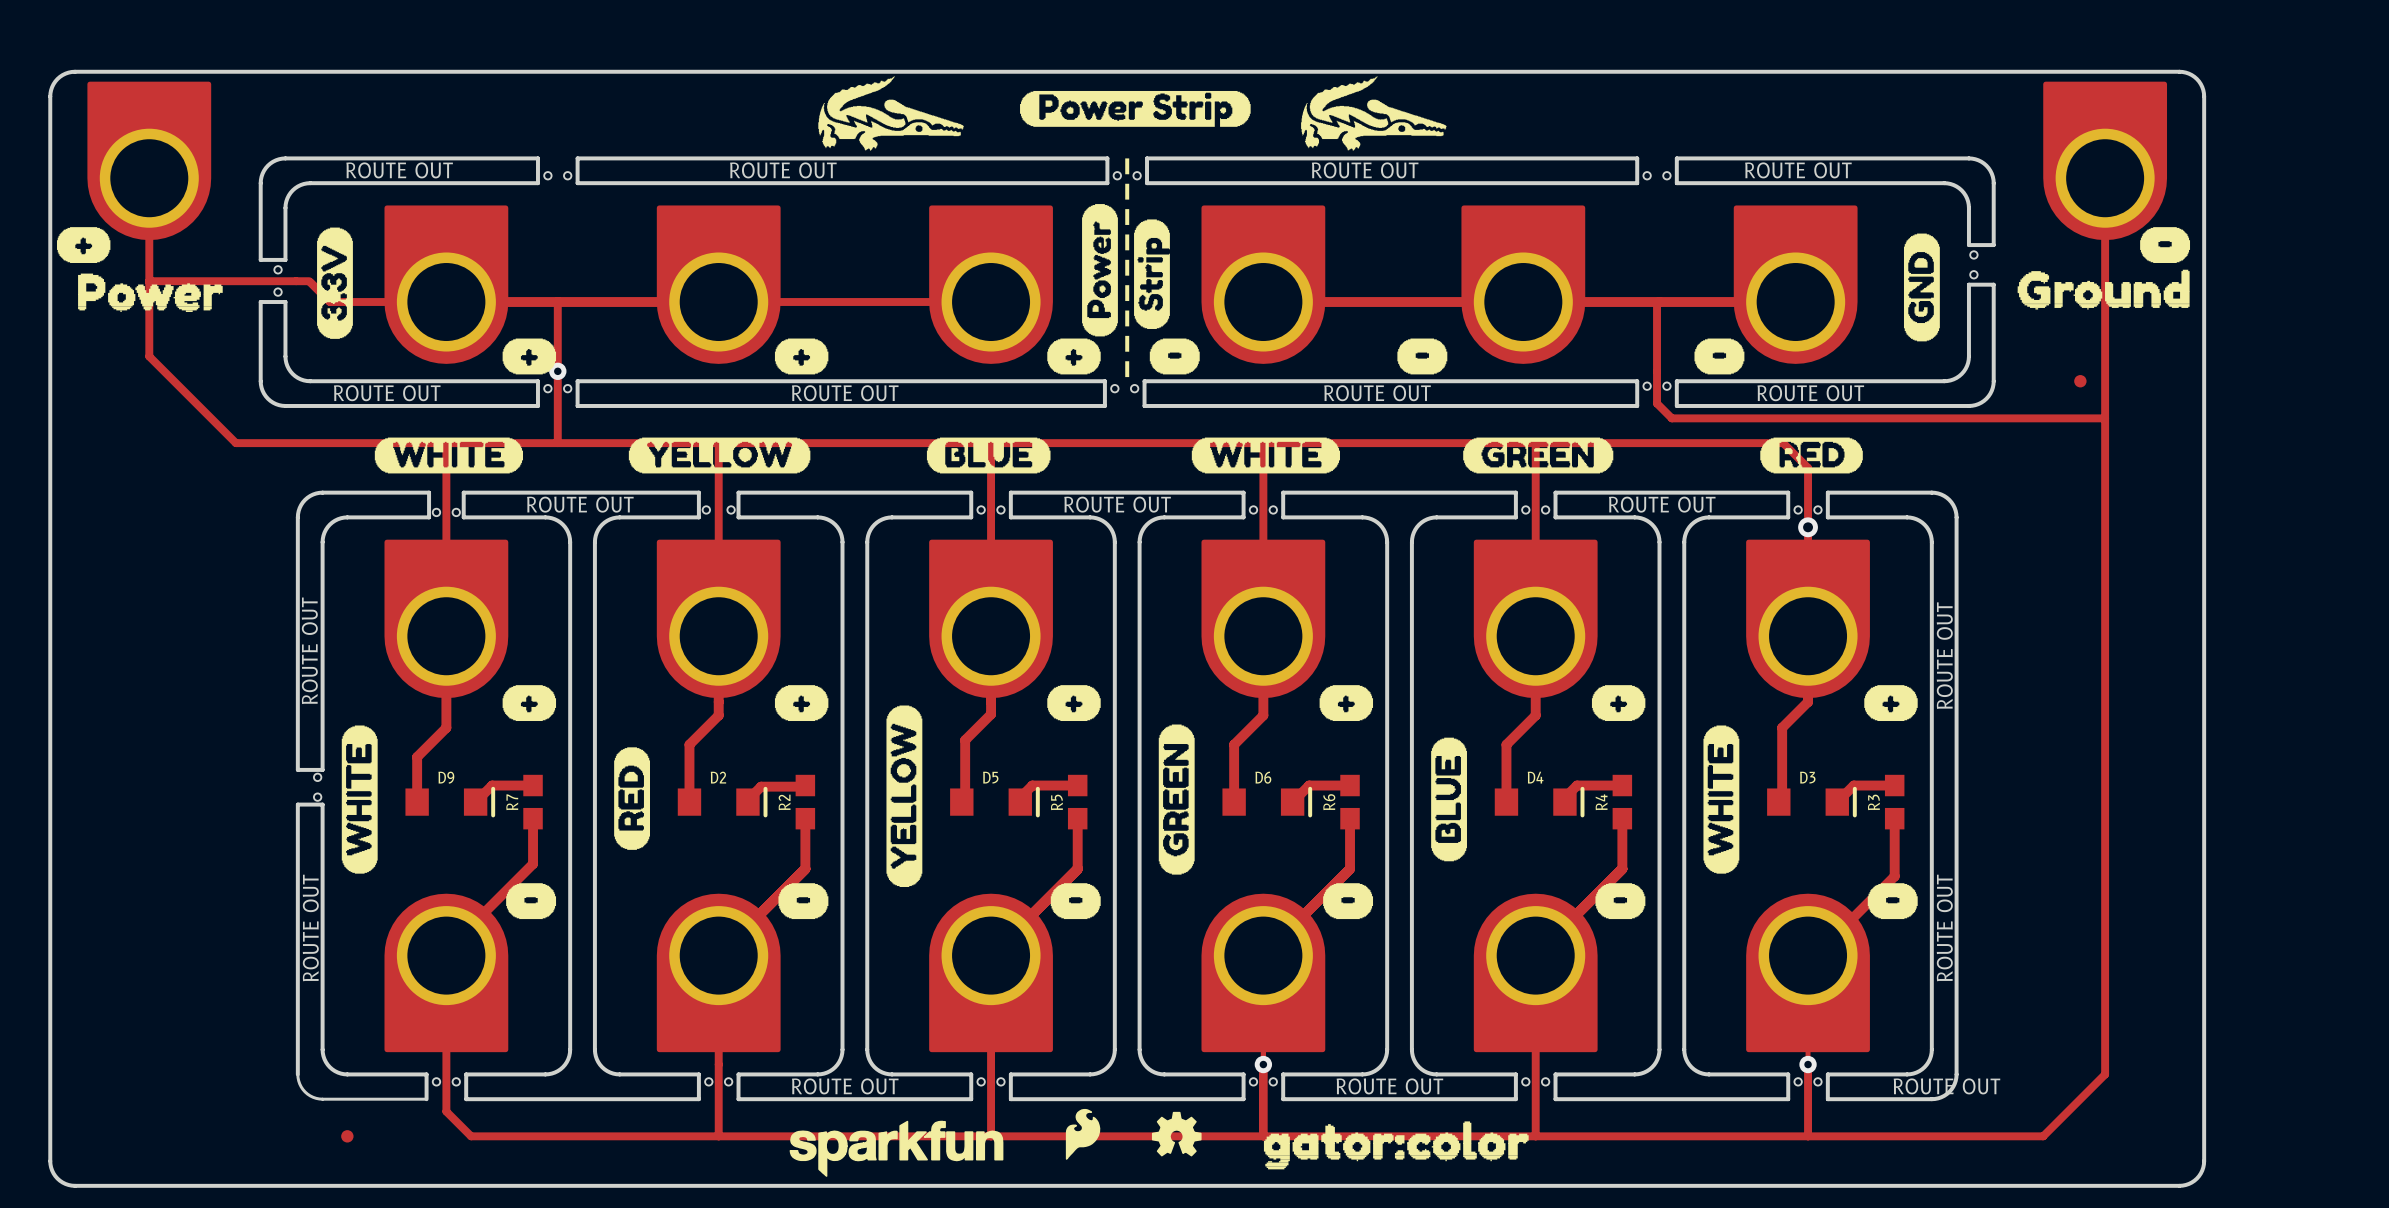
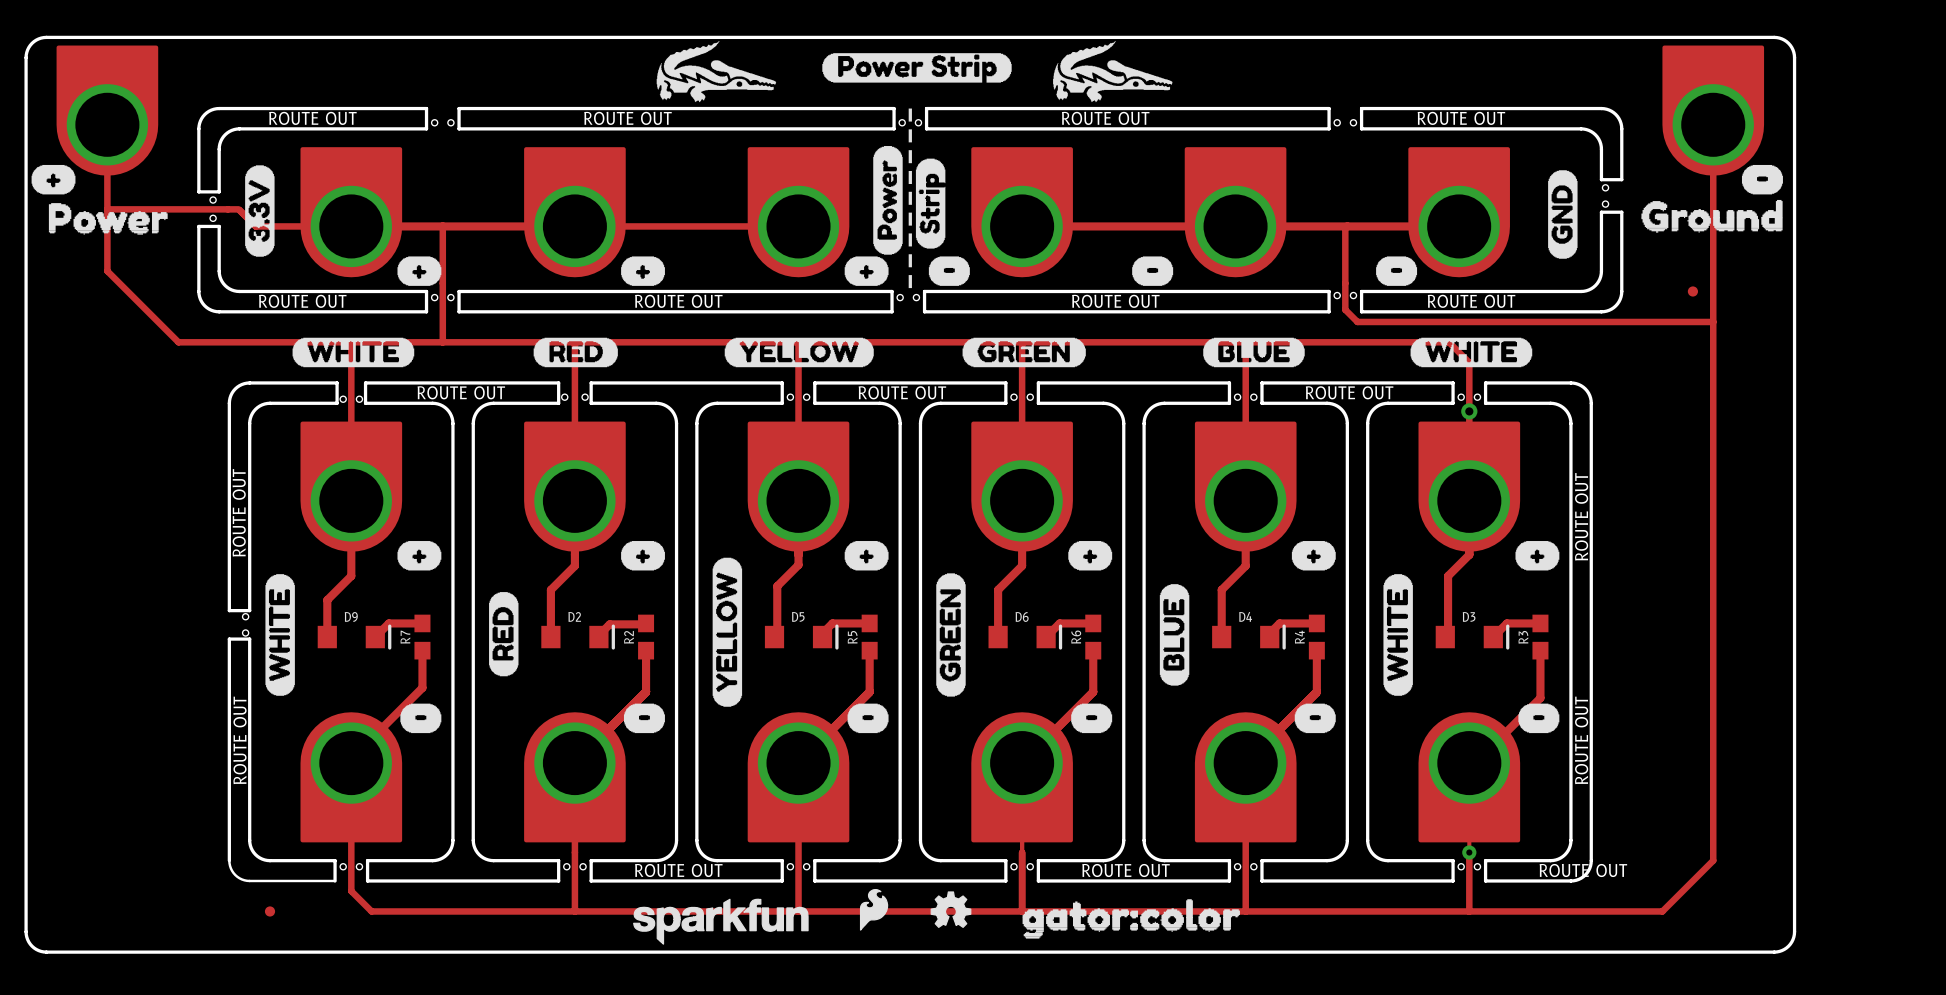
via: (557, 371) -> none
drawing: none -> [533, 337, 618, 368]
drawing: [926, 437, 1051, 474] -> none
drawing: [1191, 437, 1340, 474] -> none
drawing: none -> [1203, 337, 1305, 368]
drawing shape: [1760, 437, 1863, 474] -> [1410, 337, 1533, 368]
drawing position: (719, 455) -> (799, 352)
drawing position: (1538, 455) -> (1024, 352)
via: (1263, 1064) -> none

